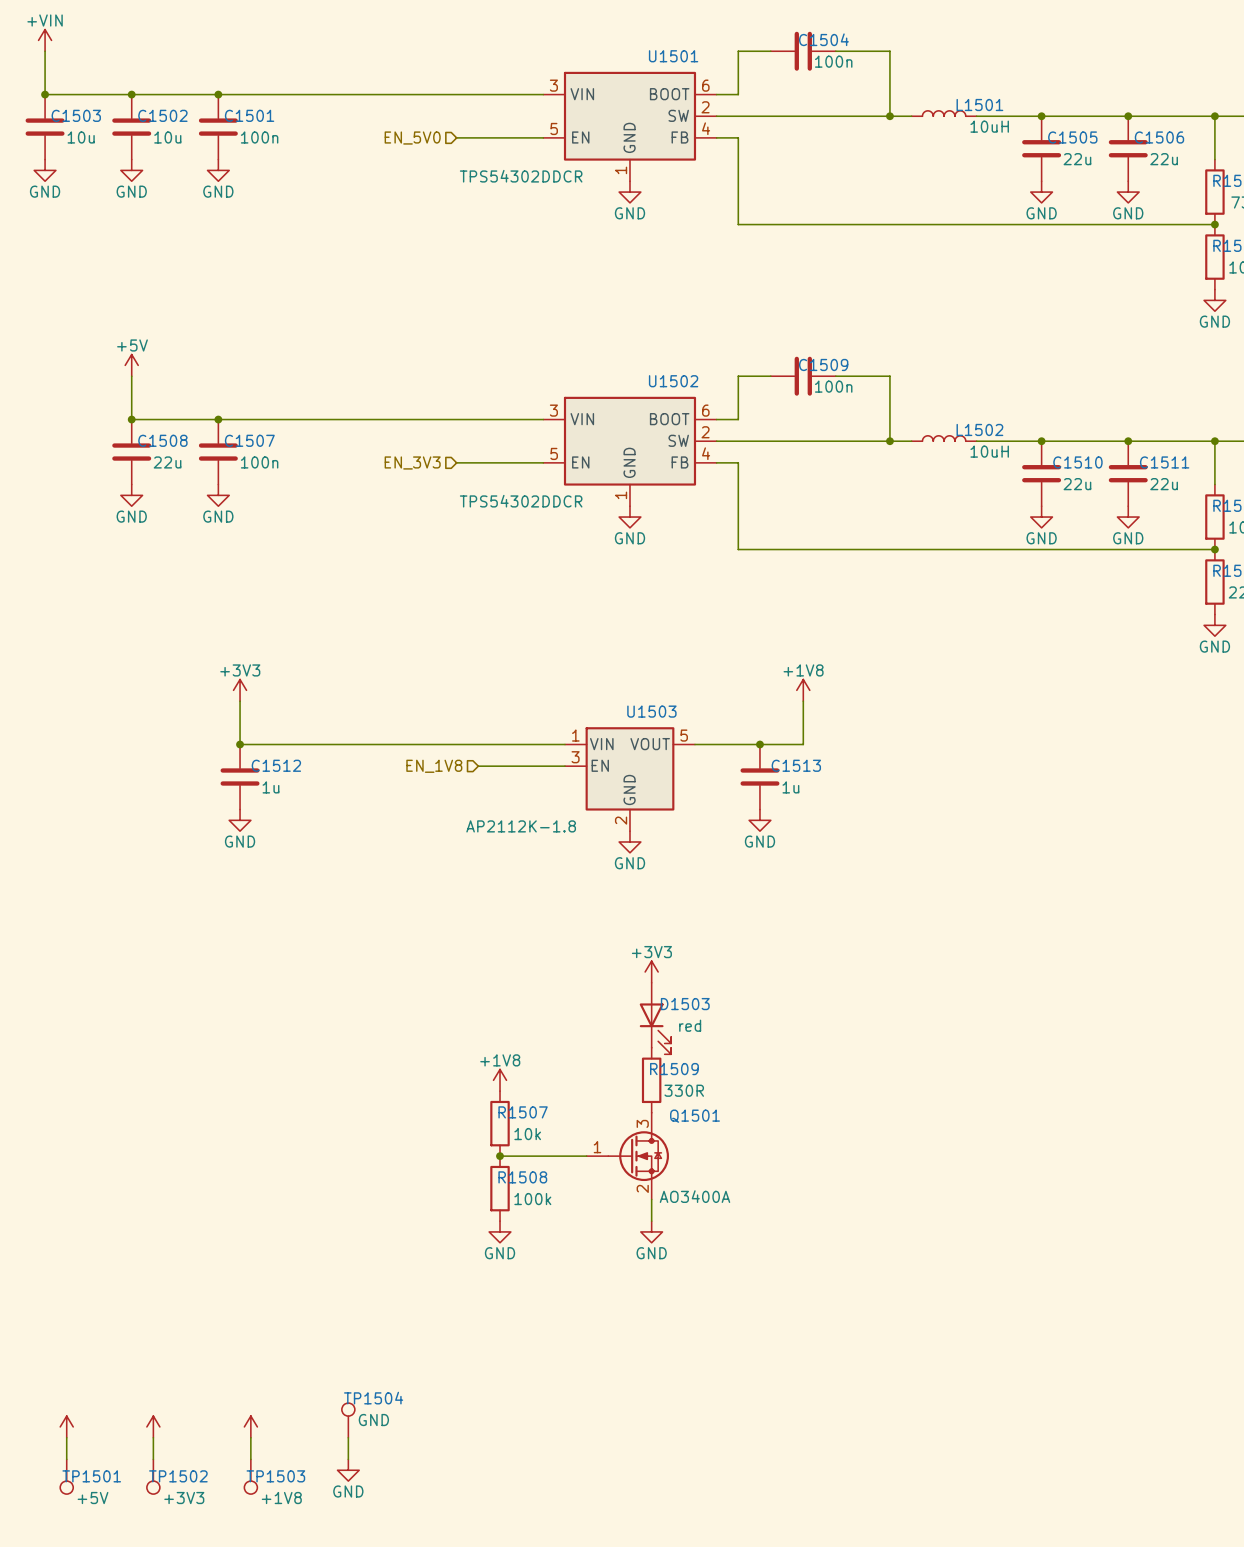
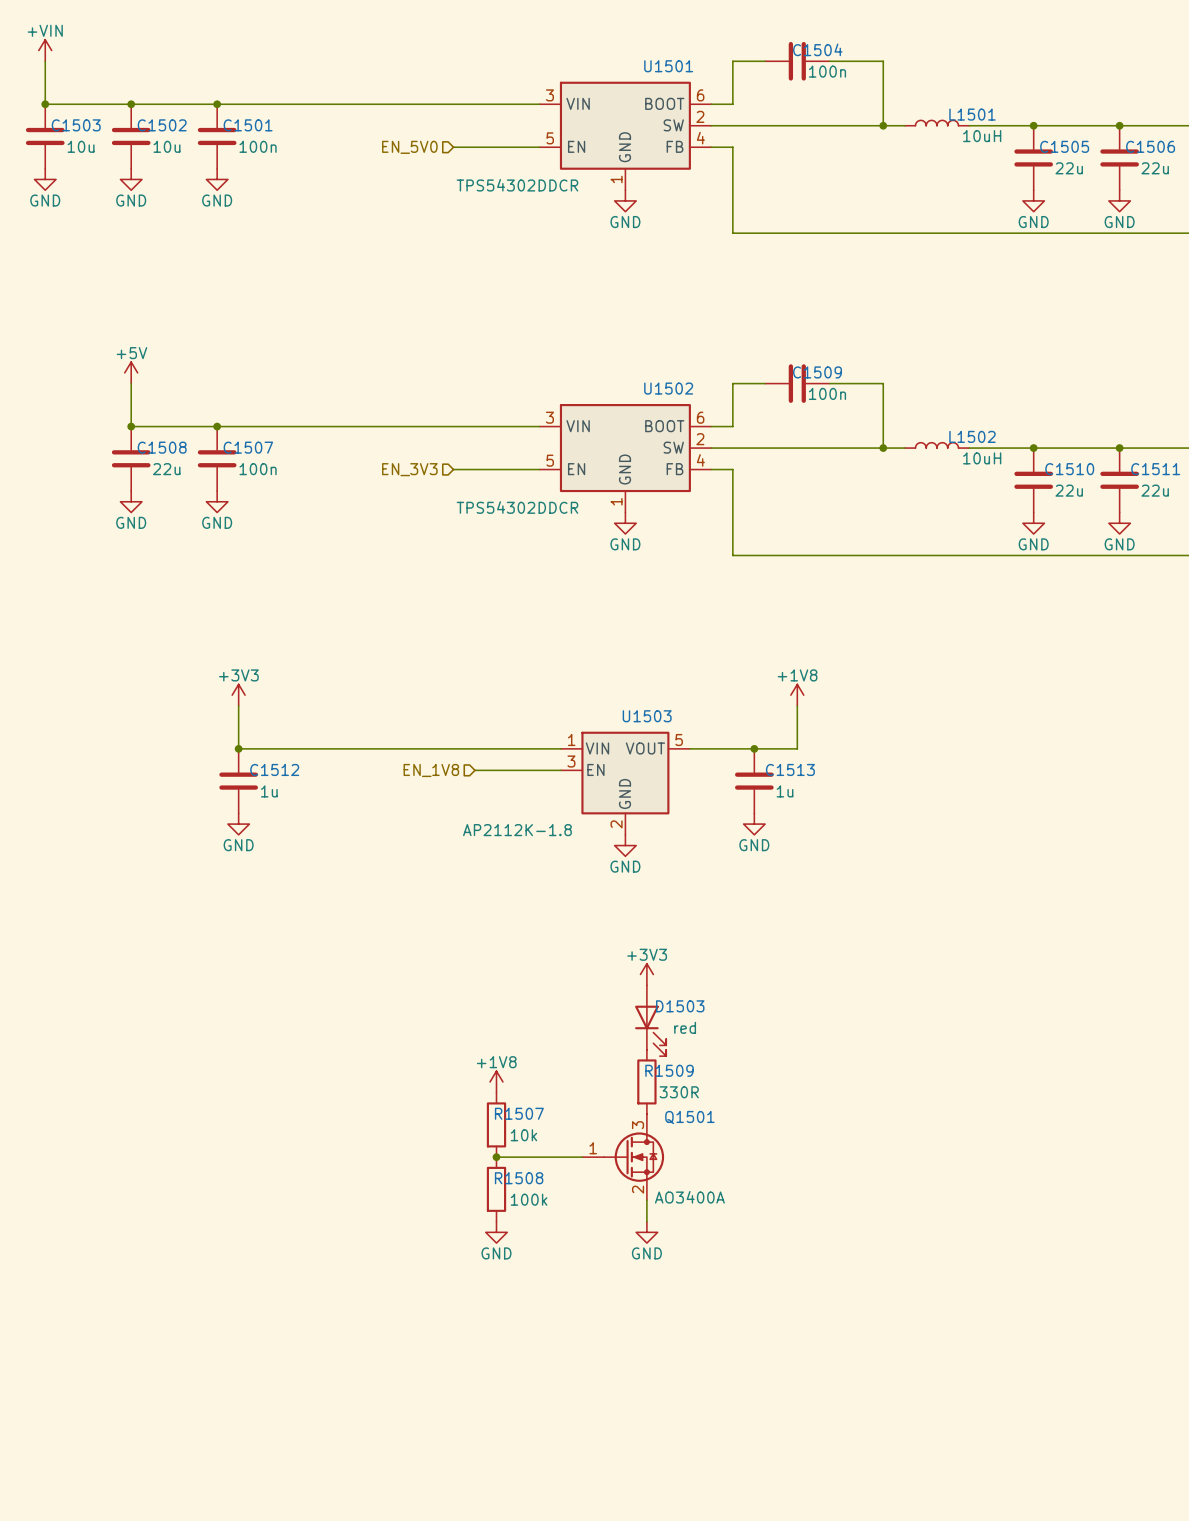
TP1504: GND (348, 1420) -> none
power symbol: (66, 1426) -> none
power symbol: (153, 1426) -> none
power symbol: (250, 1426) -> none
wire: (66, 1437) (66, 1459) -> none
wire: (153, 1437) (153, 1459) -> none
wire: (250, 1437) (250, 1459) -> none
wire: (348, 1437) (348, 1459) -> none
power symbol: GND (348, 1470) -> none
TP1501: +5V (66, 1476) -> none
TP1502: +3V3 (153, 1476) -> none
TP1503: +1V8 (250, 1476) -> none

